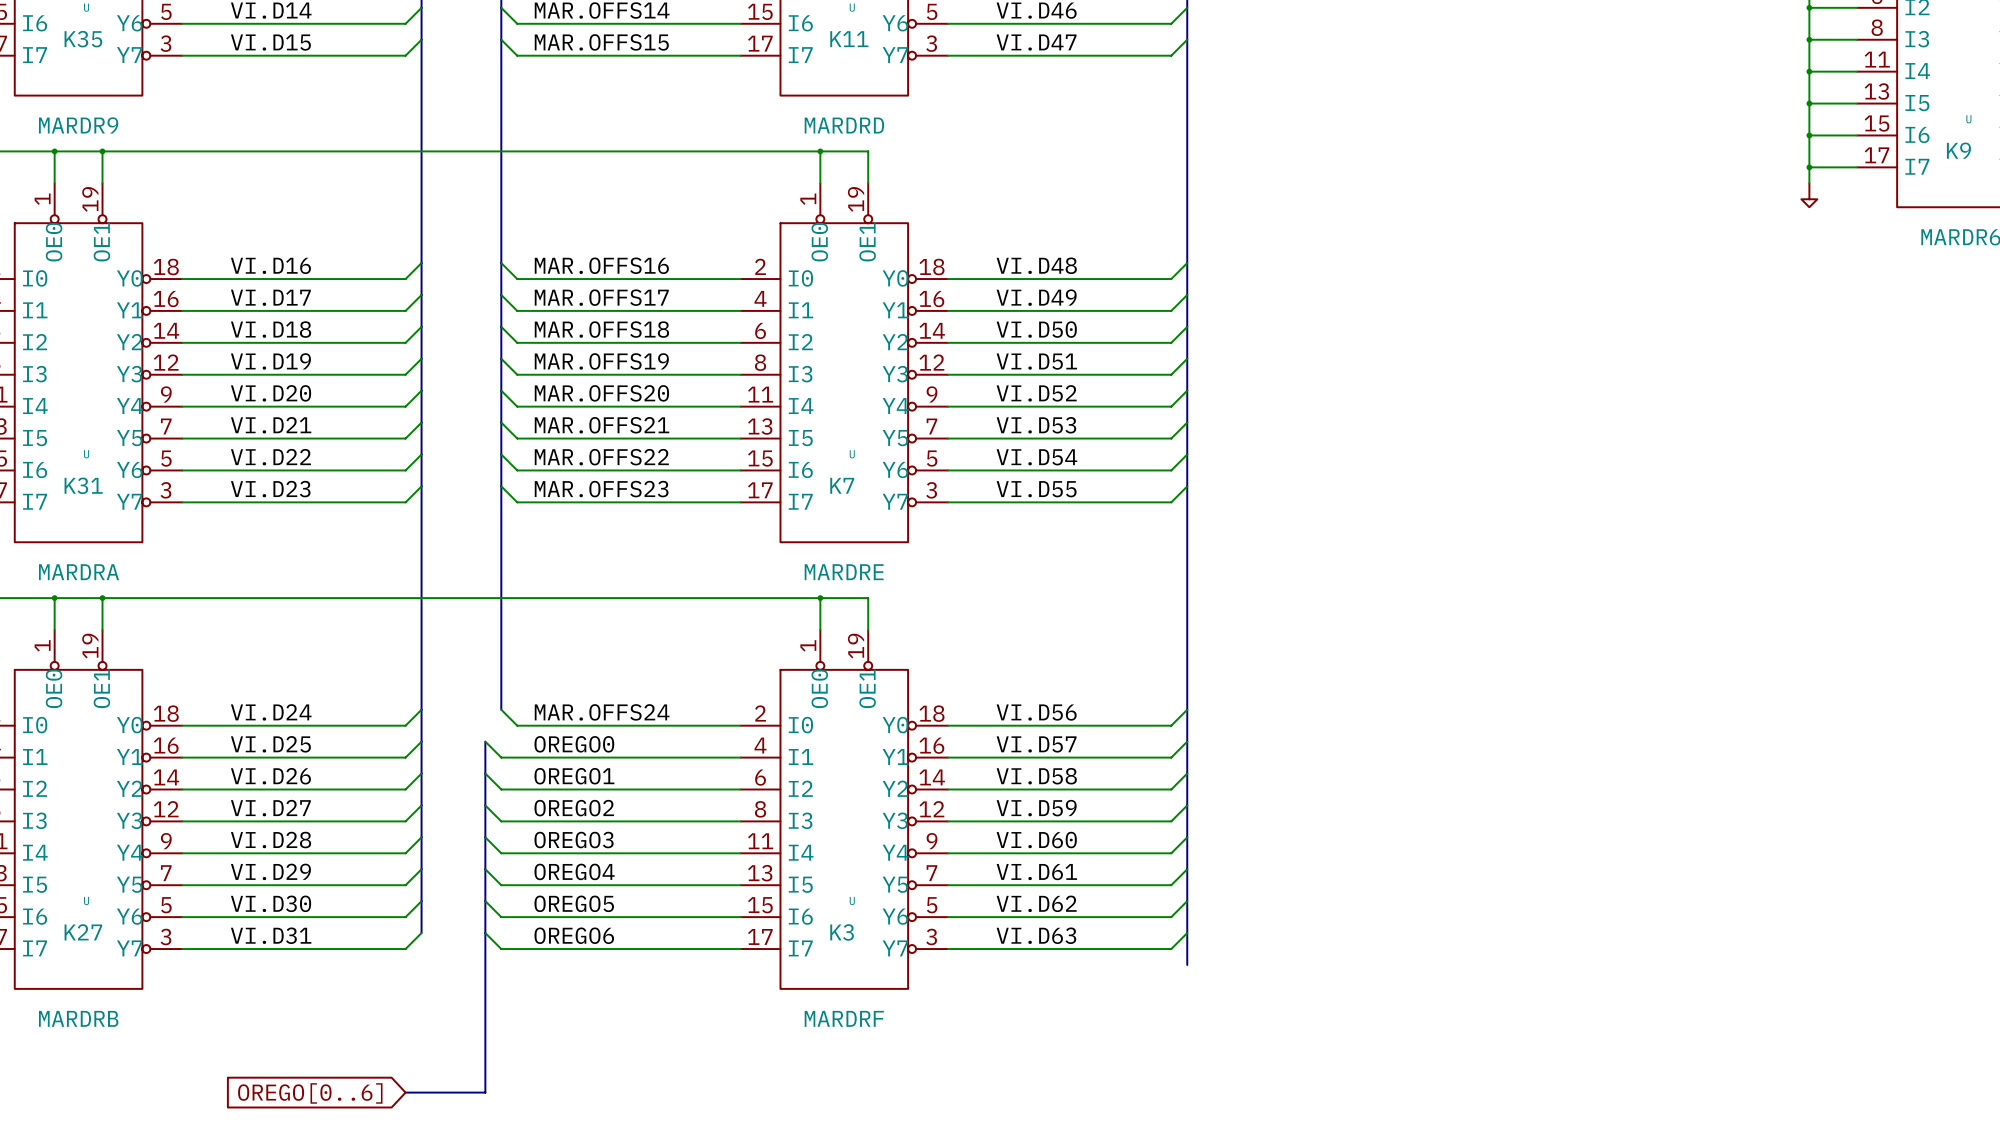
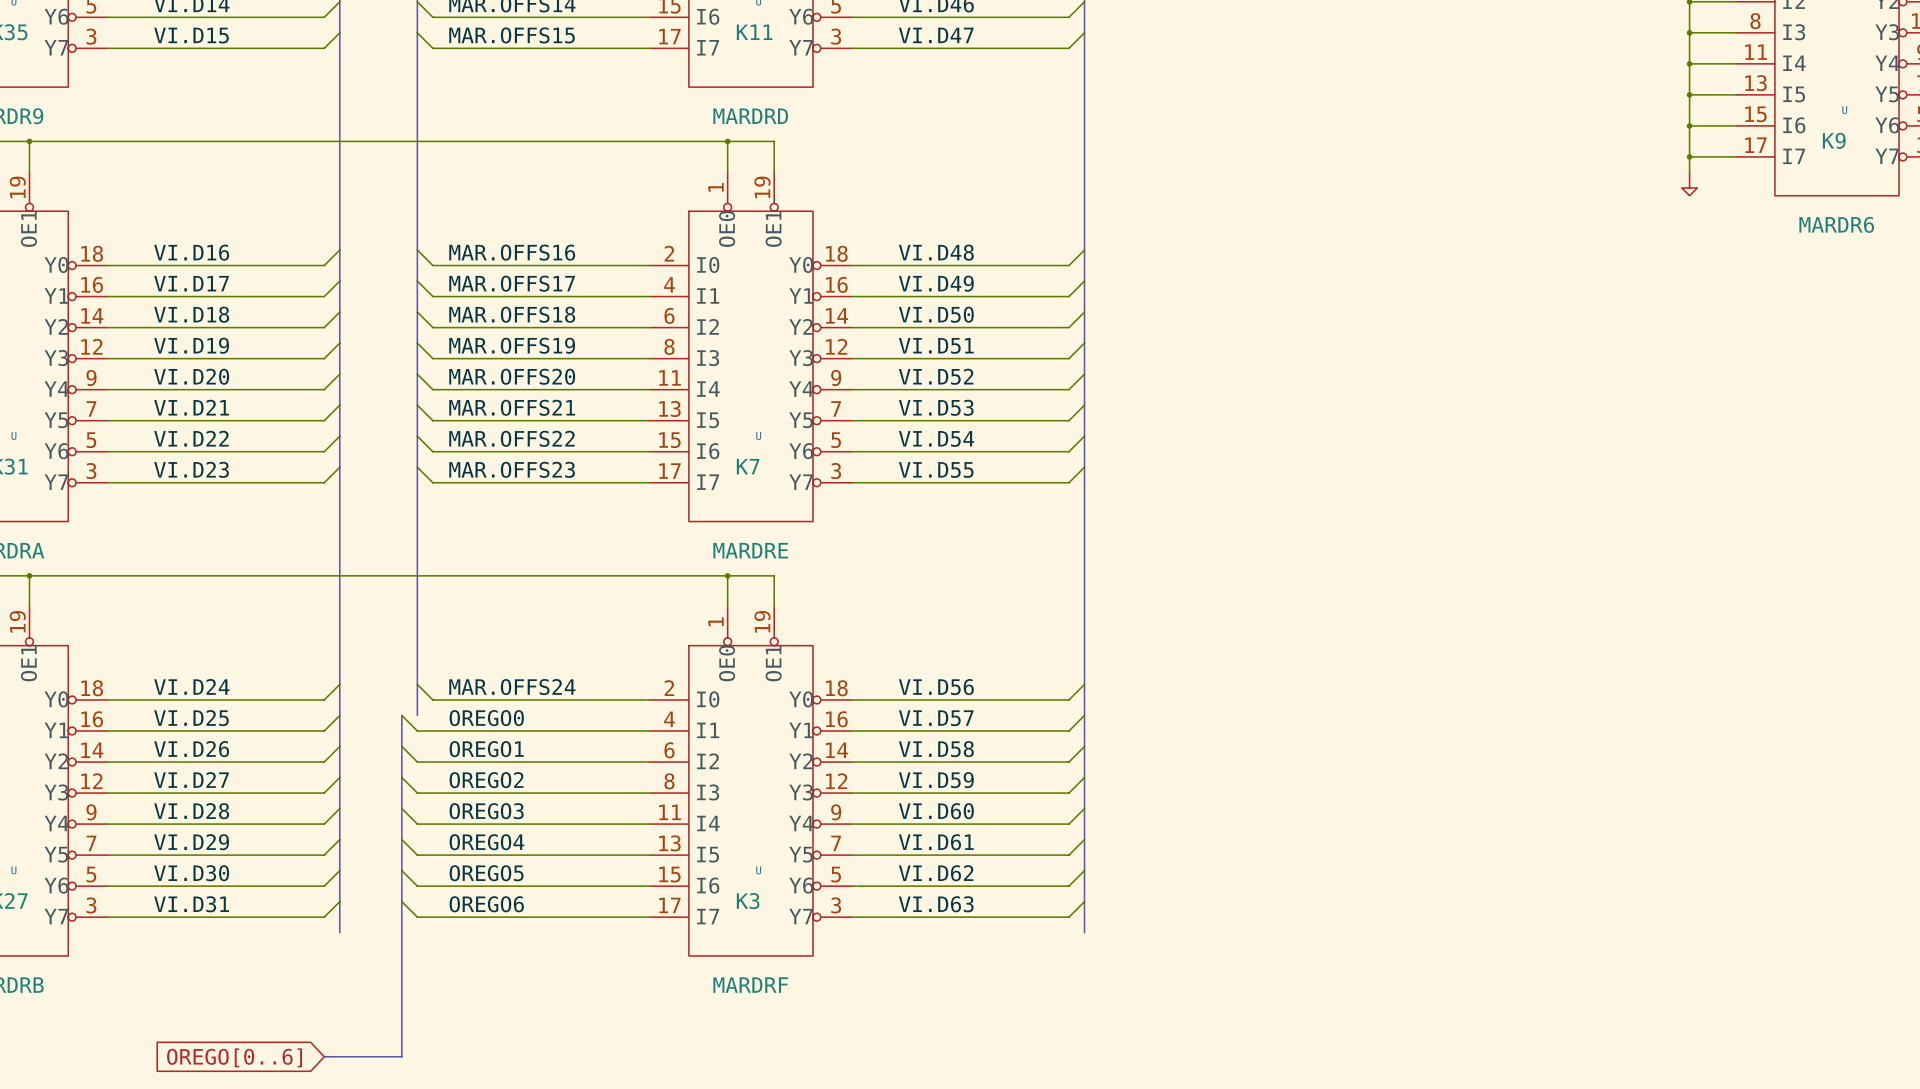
bus: none -> (417, 684) (417, 715)
bus: none -> (339, 901) (339, 932)

